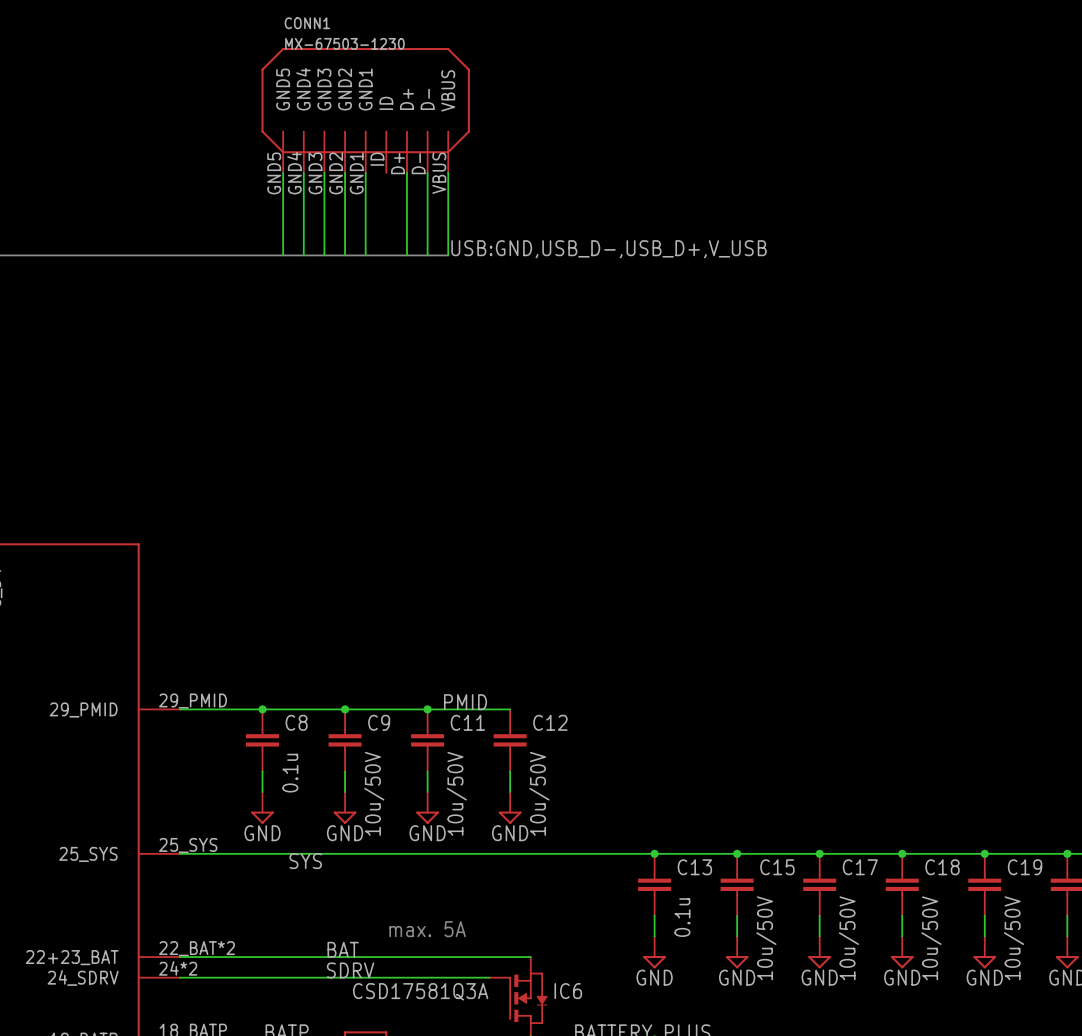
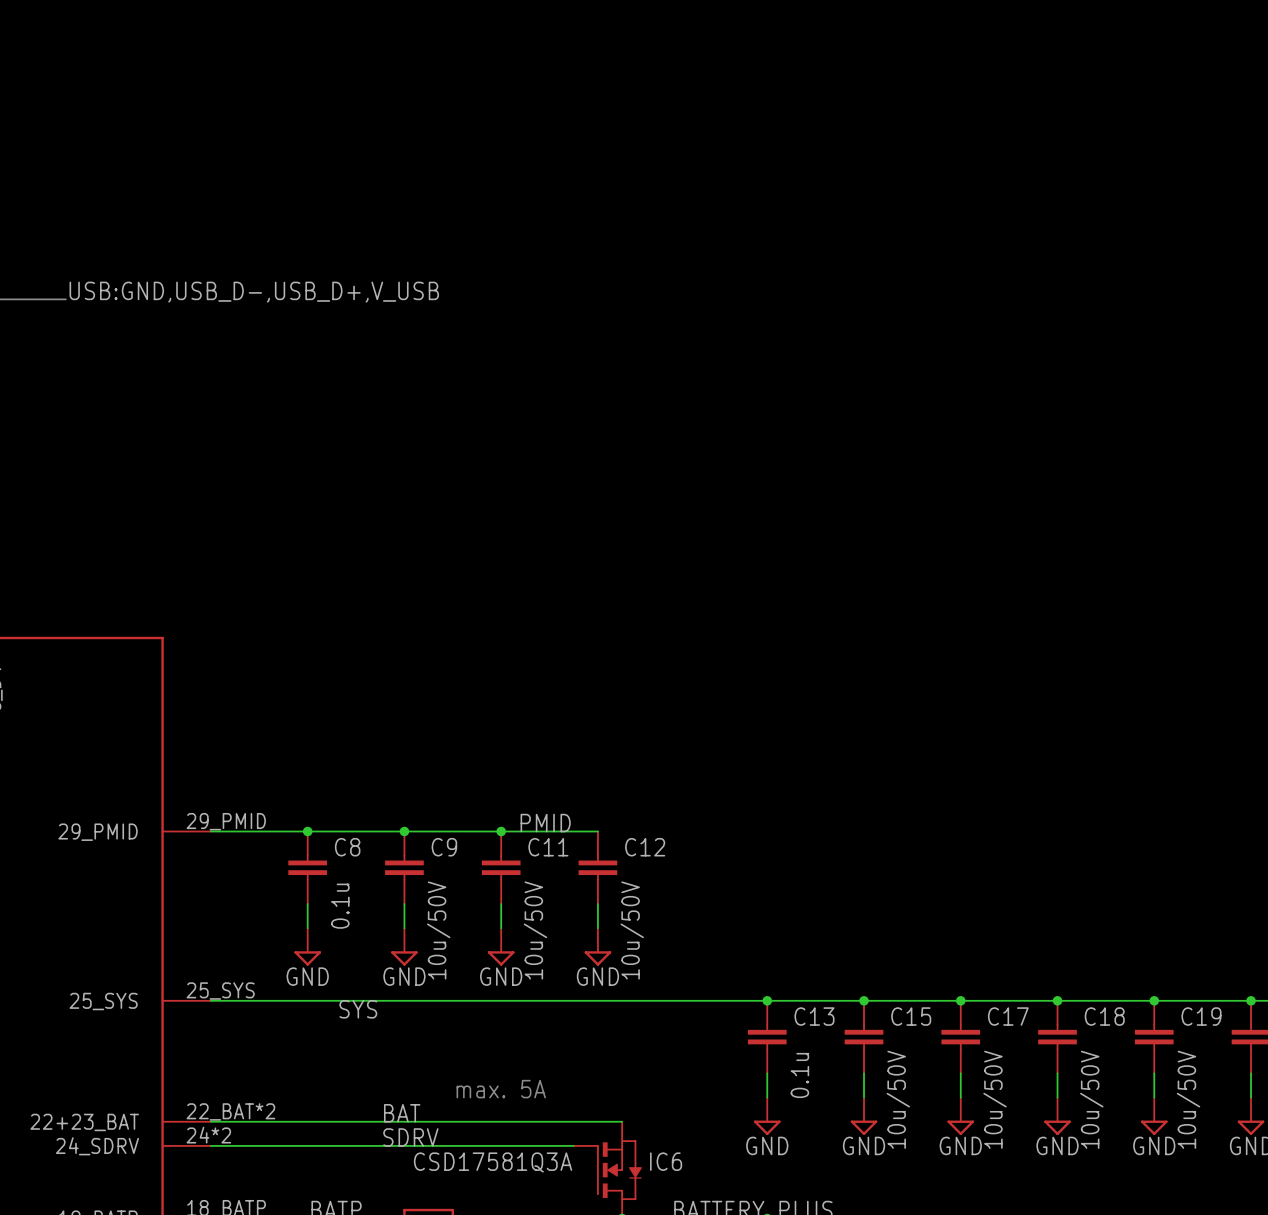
CONN1: MX-67503-1230 (365, 110) -> none
wire: (283, 172) (283, 255) -> none
wire: (303, 172) (303, 255) -> none
wire: (324, 172) (324, 255) -> none
wire: (345, 172) (345, 255) -> none
wire: (365, 172) (365, 255) -> none
wire: (406, 172) (406, 255) -> none
wire: (427, 172) (427, 255) -> none
wire: (448, 172) (448, 255) -> none
label: none -> USB:GND,USB_D-,USB_D+,V_USB (254, 292)
label: USB:GND,USB_D-,USB_D+,V_USB (609, 249) -> none
bus: (56, 255) (448, 255) -> none

